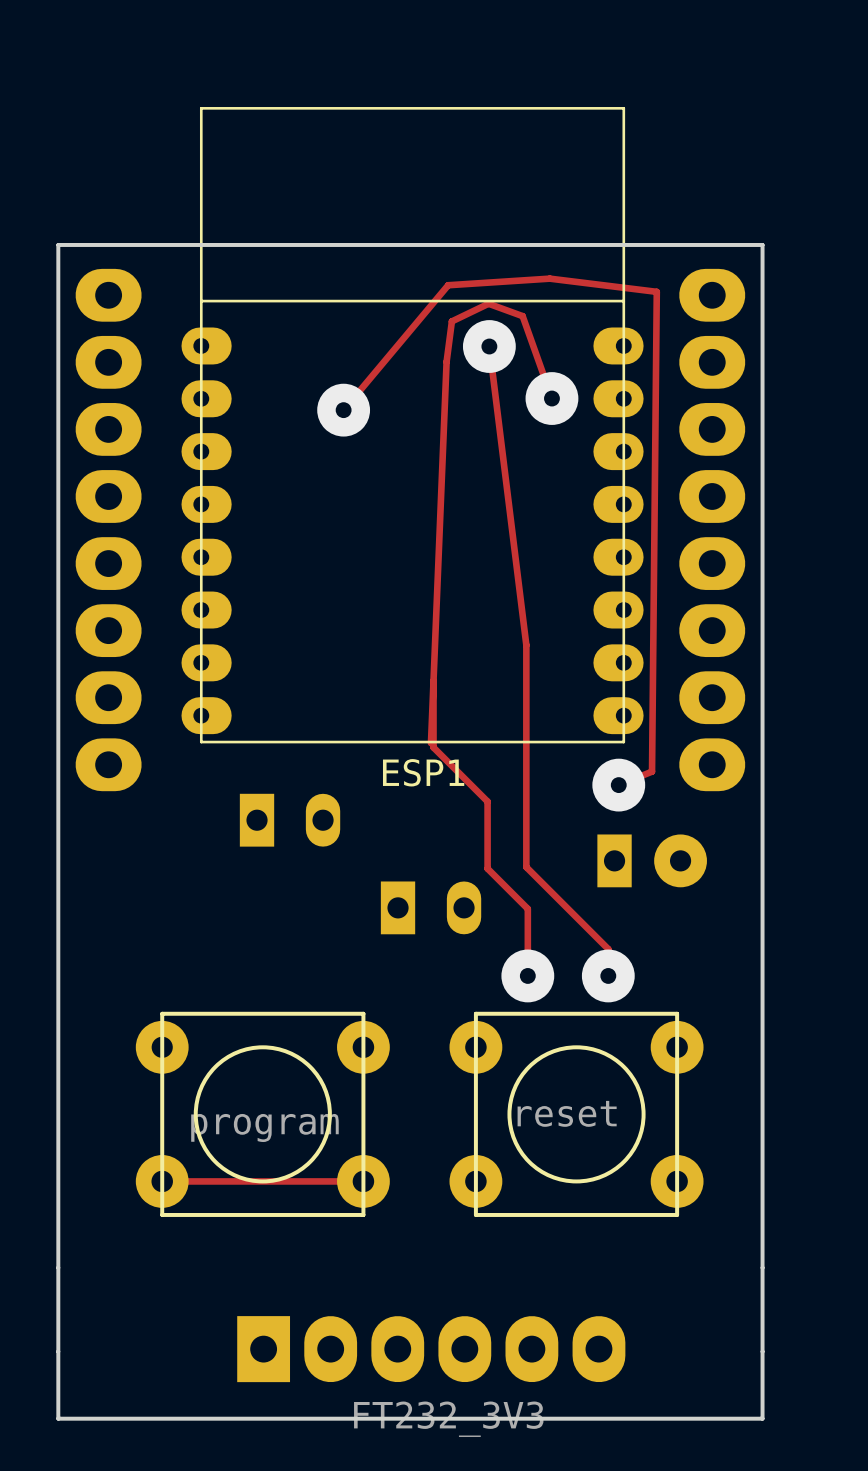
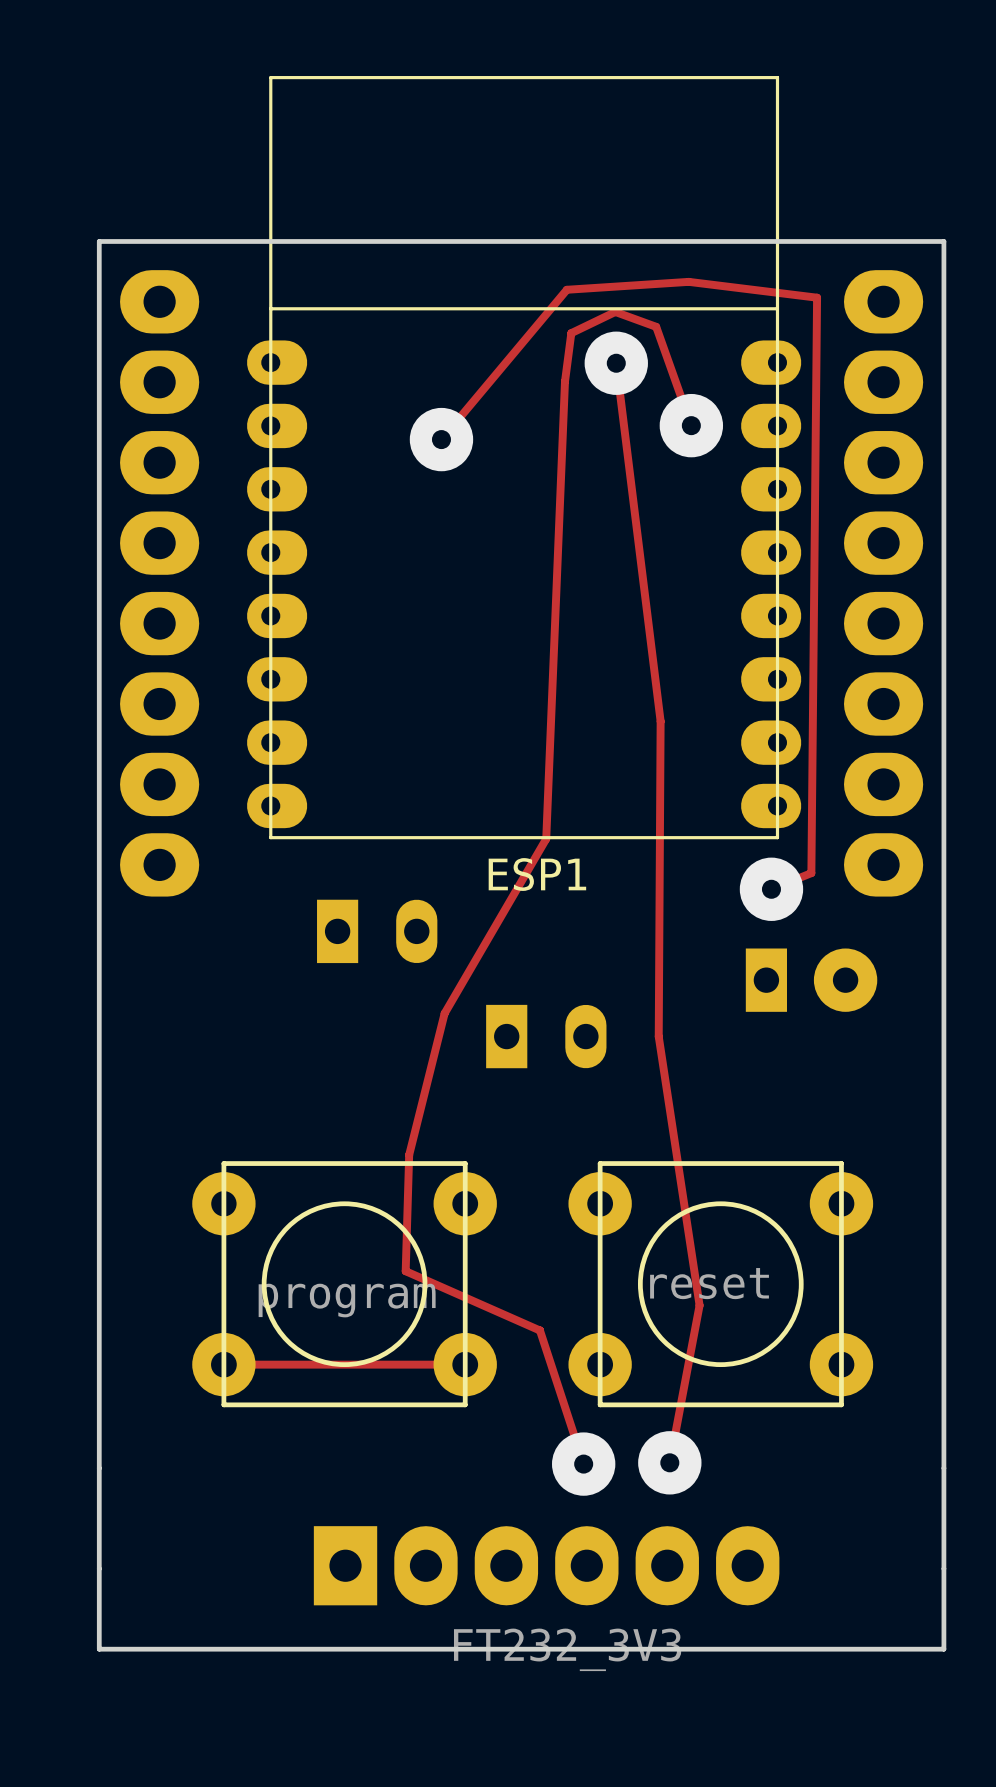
track: (526, 645) (526, 867) (608, 949) (608, 975) -> (660, 721) (658, 1036) (699, 1305) (669, 1462)
track: (433, 680) (433, 747) (487, 801) (487, 868) (527, 908) (527, 975) (523, 971) -> none
track: none -> (546, 838) (444, 1013) (409, 1154) (405, 1271) (539, 1330) (583, 1464) (578, 1458)
via: (527, 975) -> none
via: (608, 975) -> none
via: none -> (669, 1462)
via: none -> (583, 1464)

